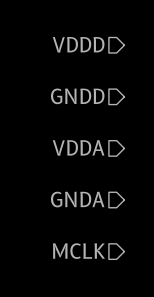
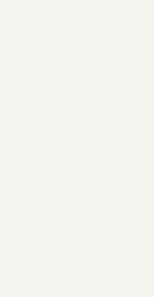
hierarchical label: VDDD (78, 44) -> none
hierarchical label: GNDD (77, 96) -> none
hierarchical label: VDDA (78, 147) -> none
hierarchical label: GNDA (77, 199) -> none
hierarchical label: MCLK (78, 251) -> none

